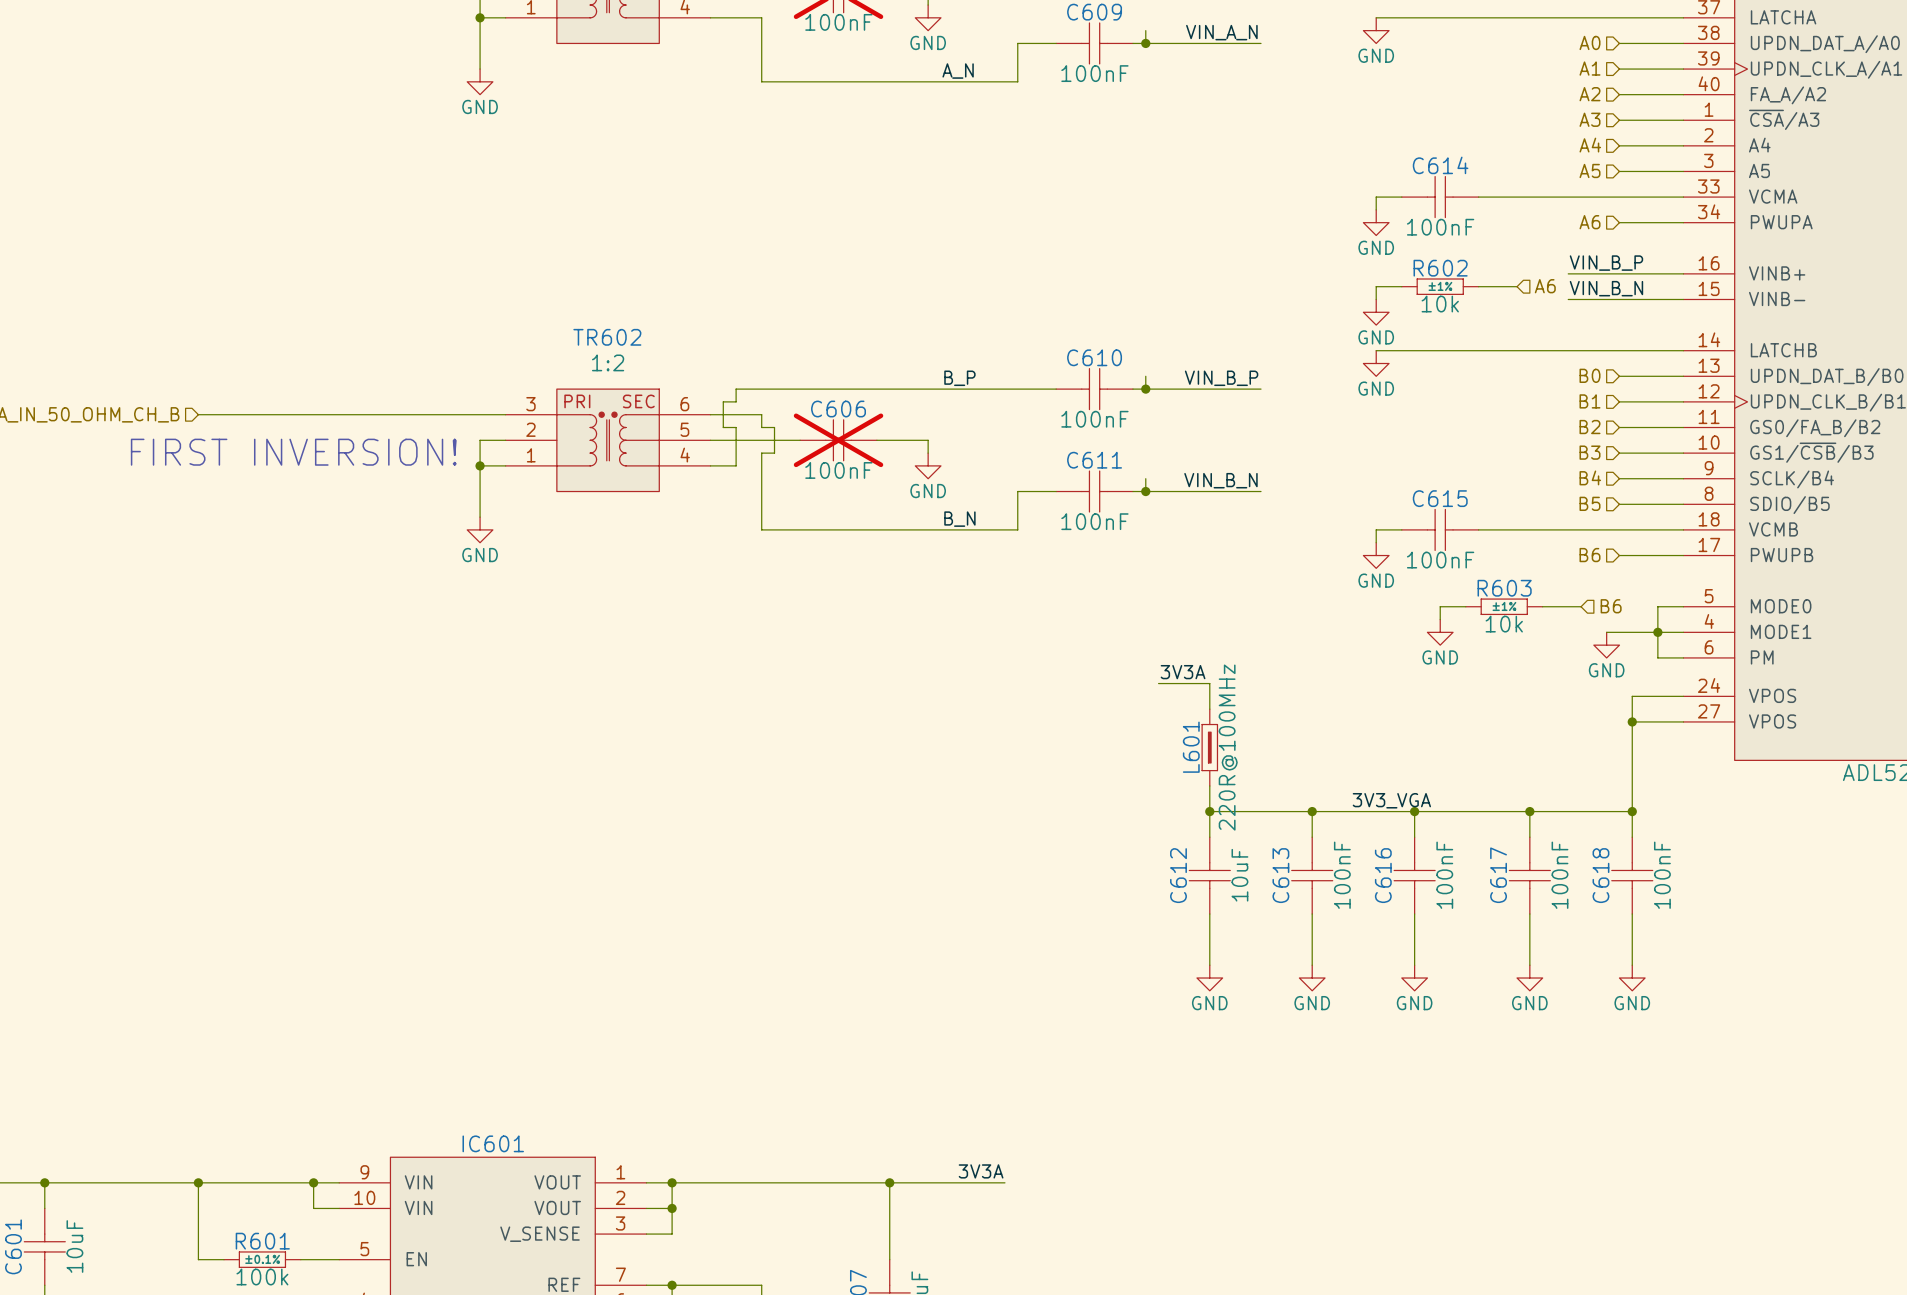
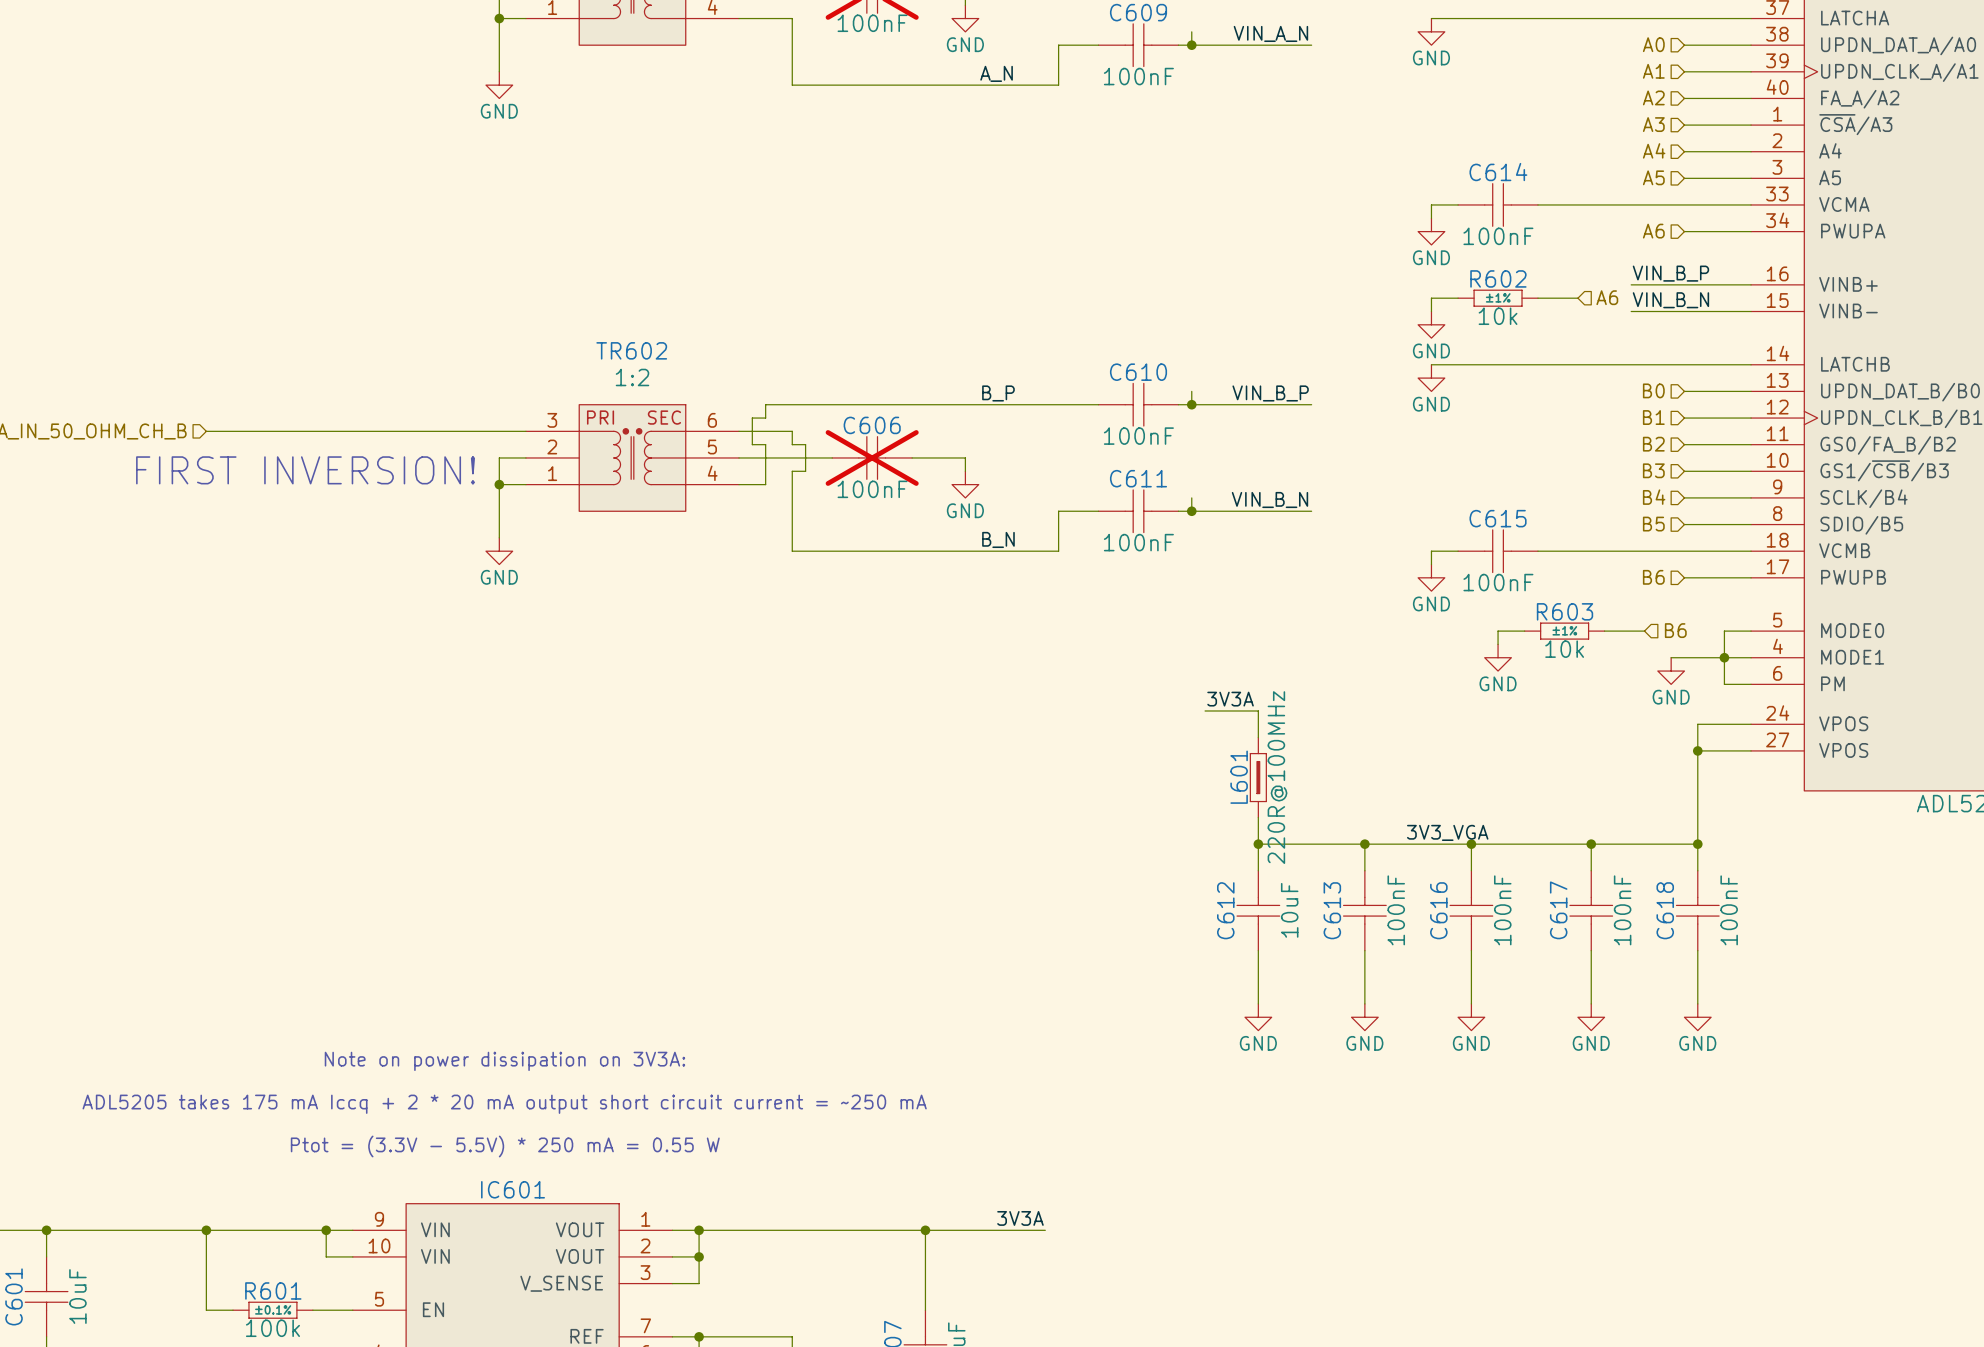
text: none -> Note on power dissipation on 3V3A: (504, 1061)
text: none -> ADL5205 takes 175 mA Iccq + 2 * 20 mA output short circuit current = ~250 mA (504, 1104)
text: none -> Ptot = (3.3V - 5.5V) * 250 mA = 0.55 W (505, 1146)

